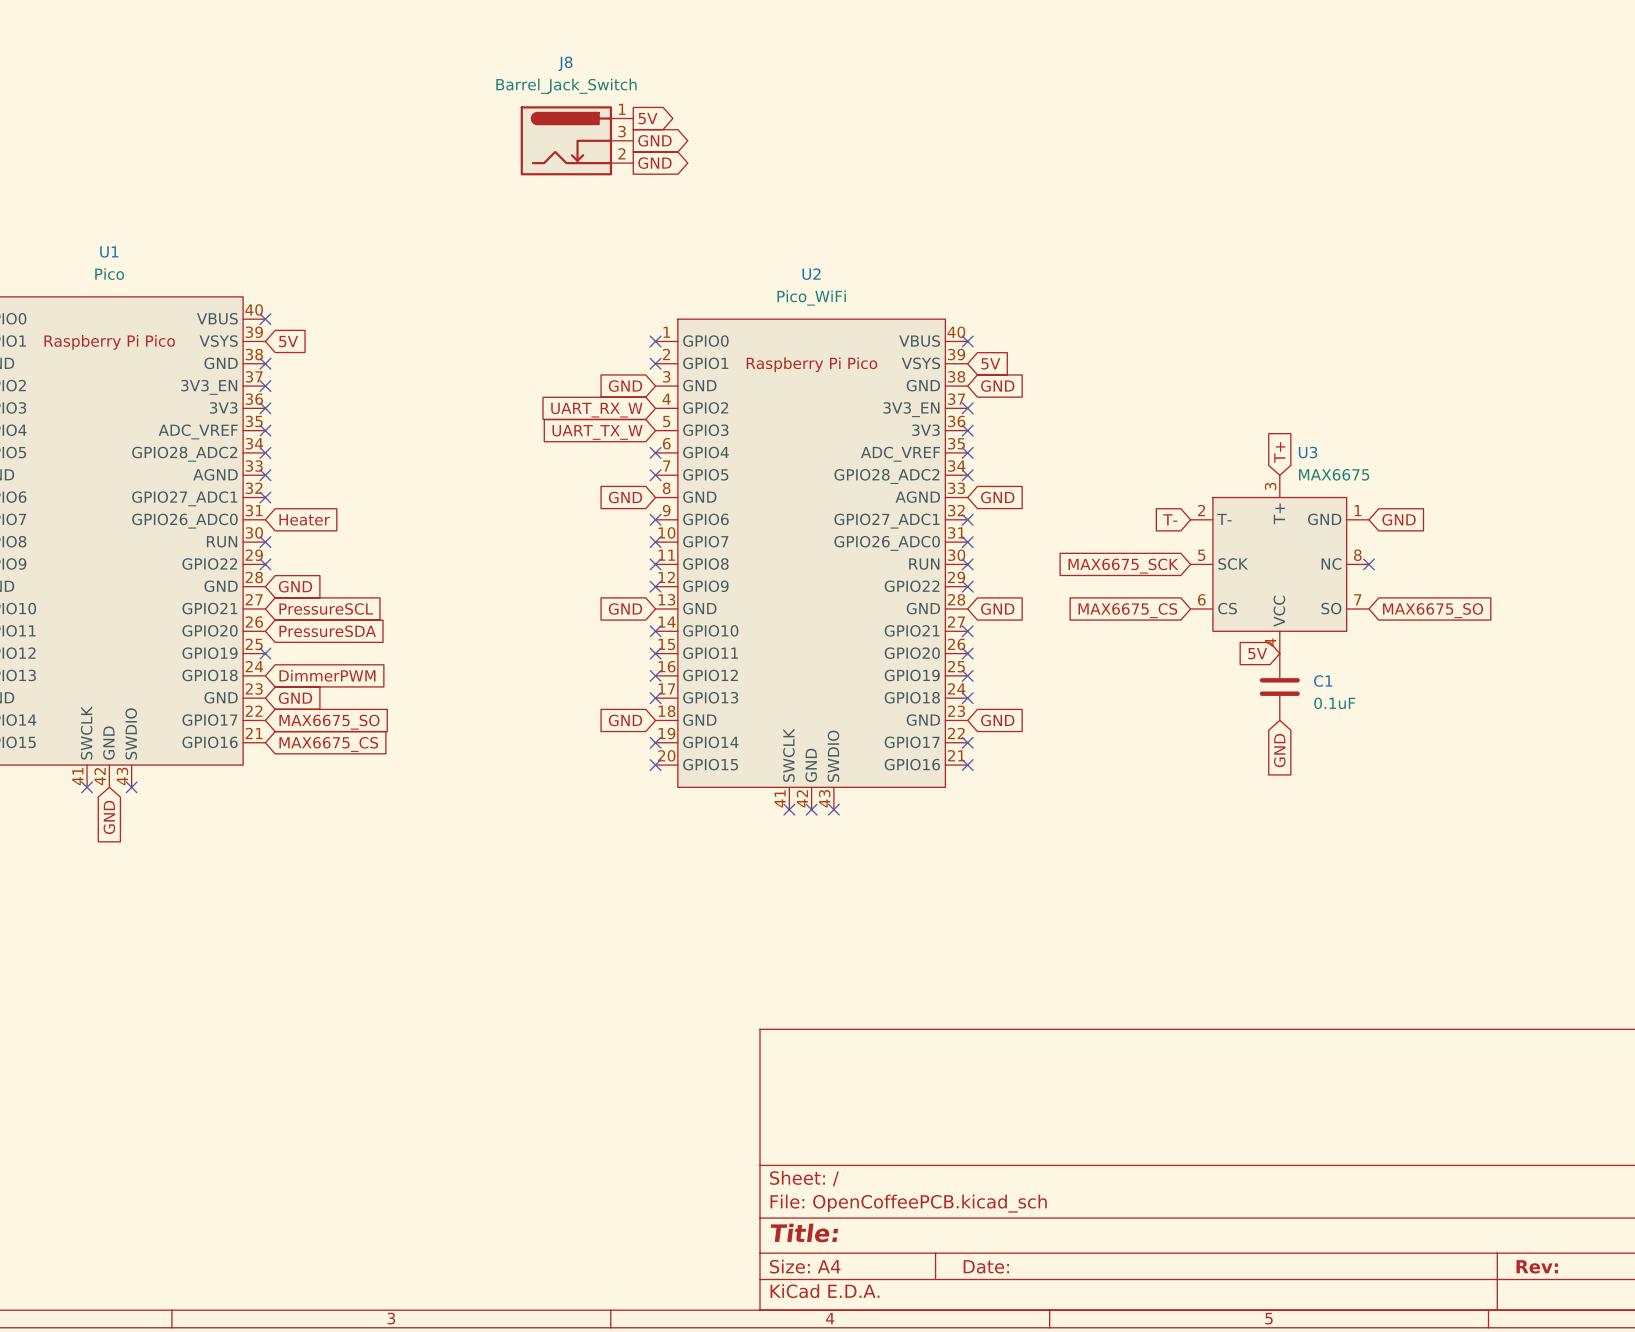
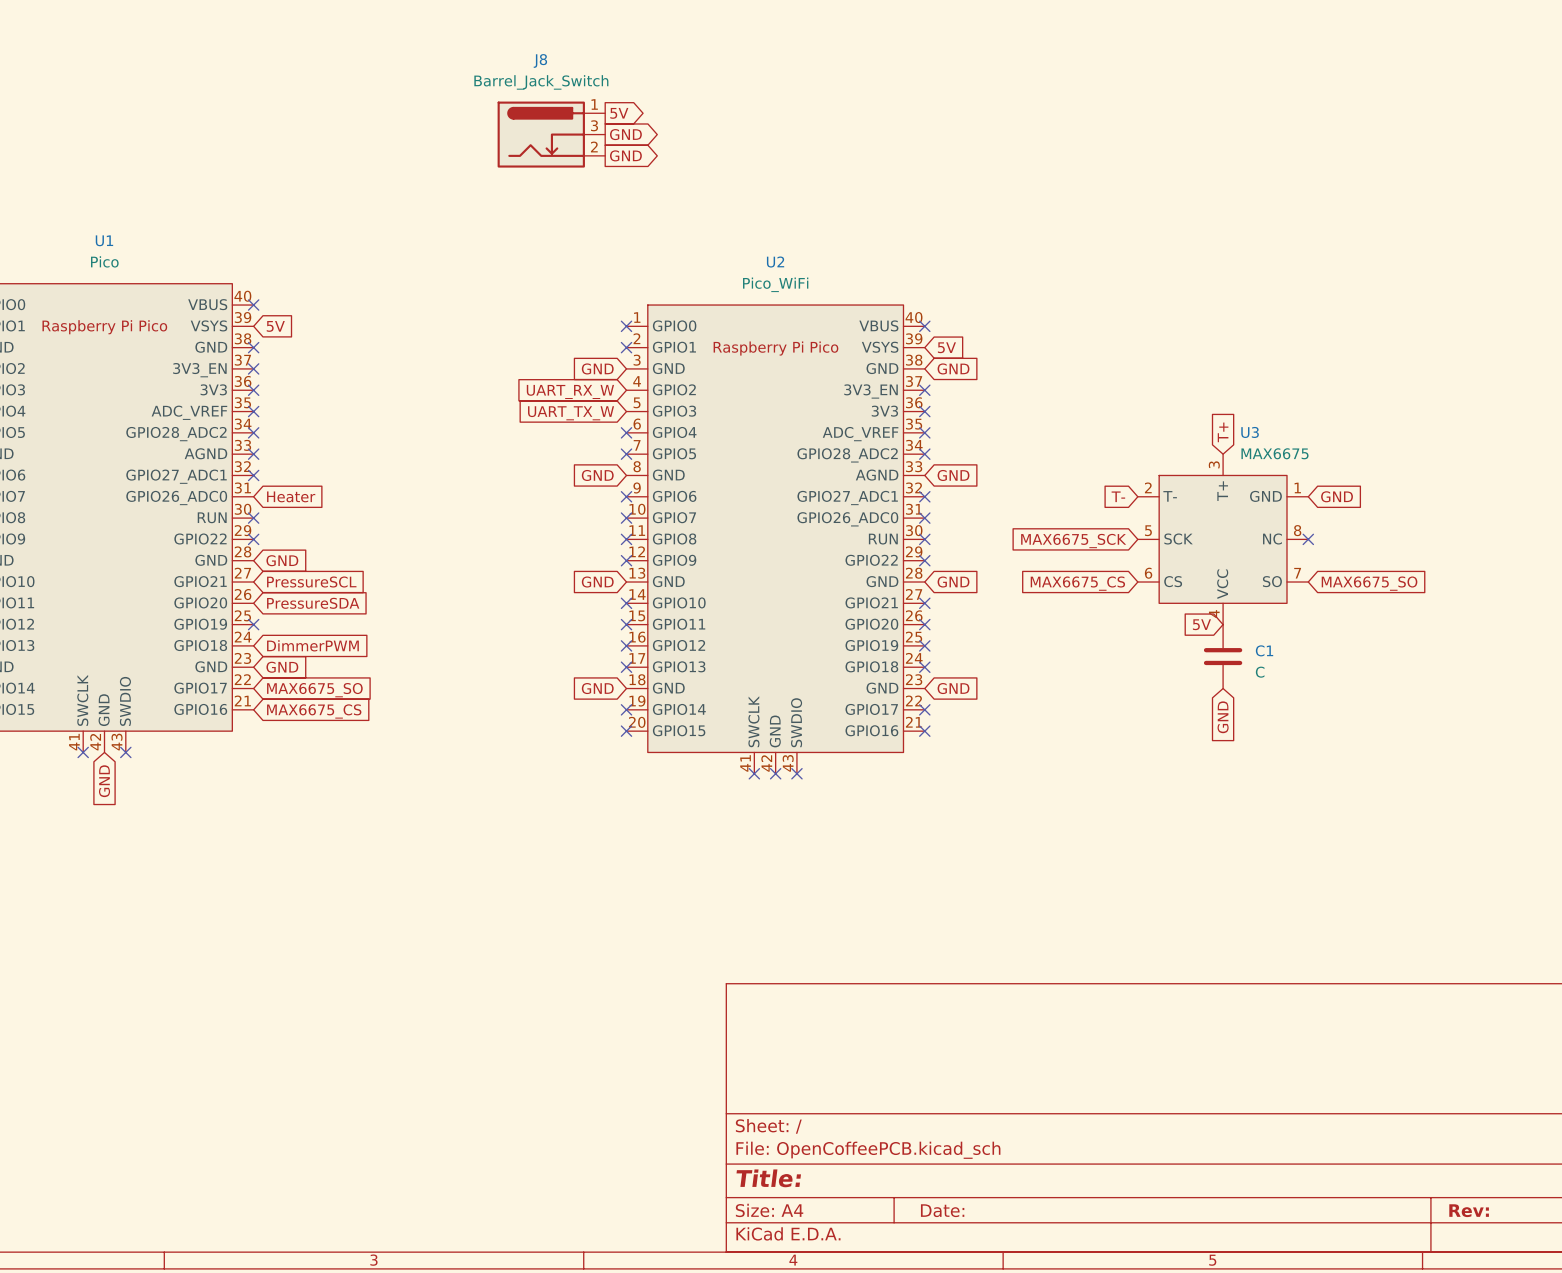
C1 value: 0.1uF (1334, 703) -> C (1260, 672)

